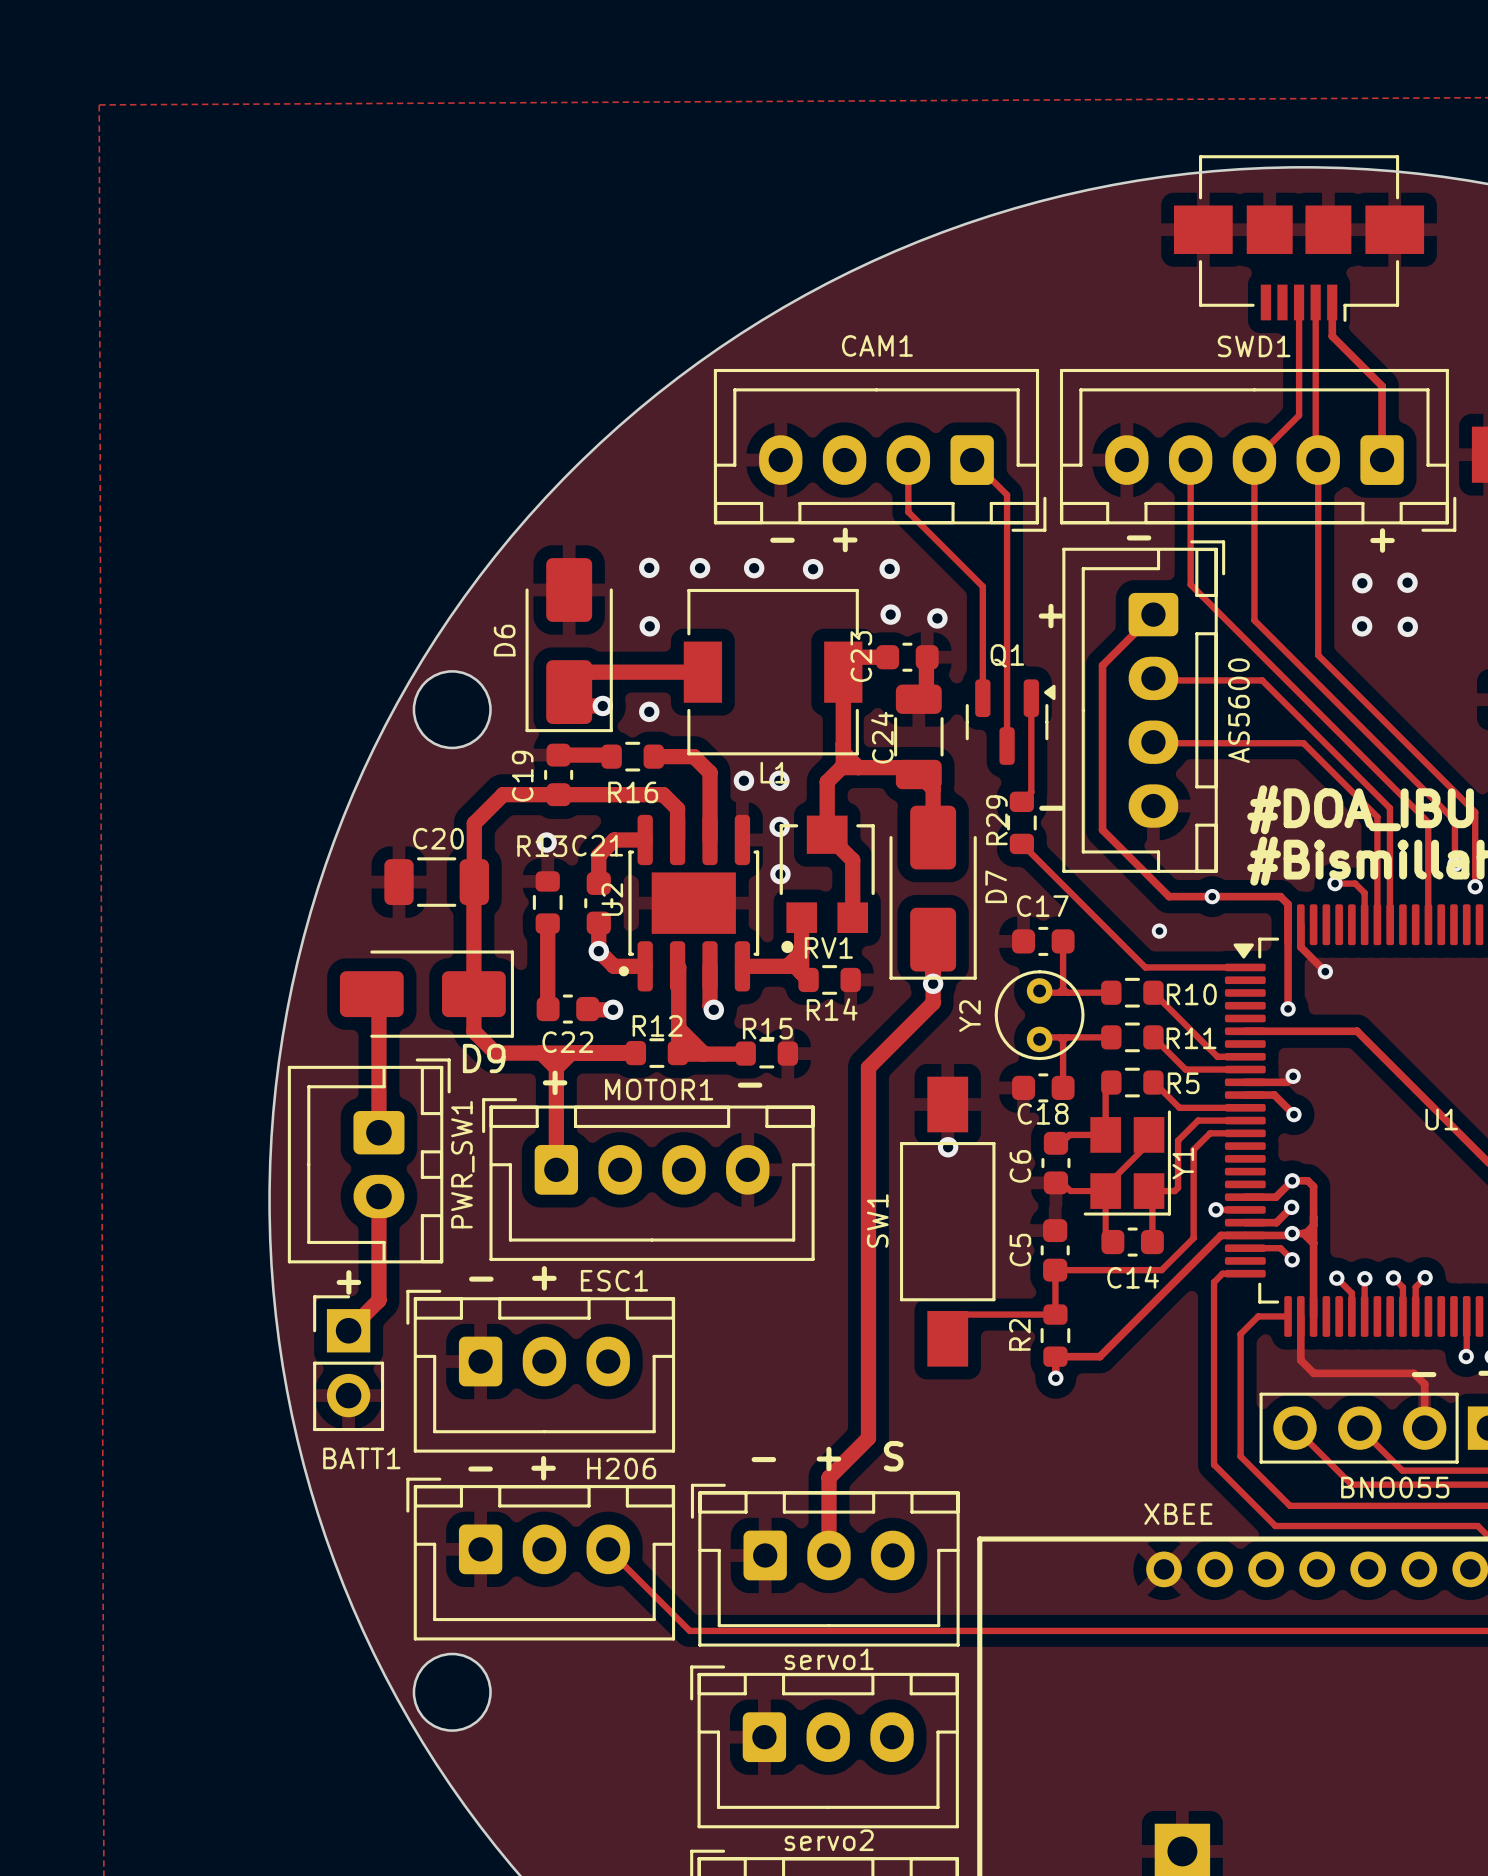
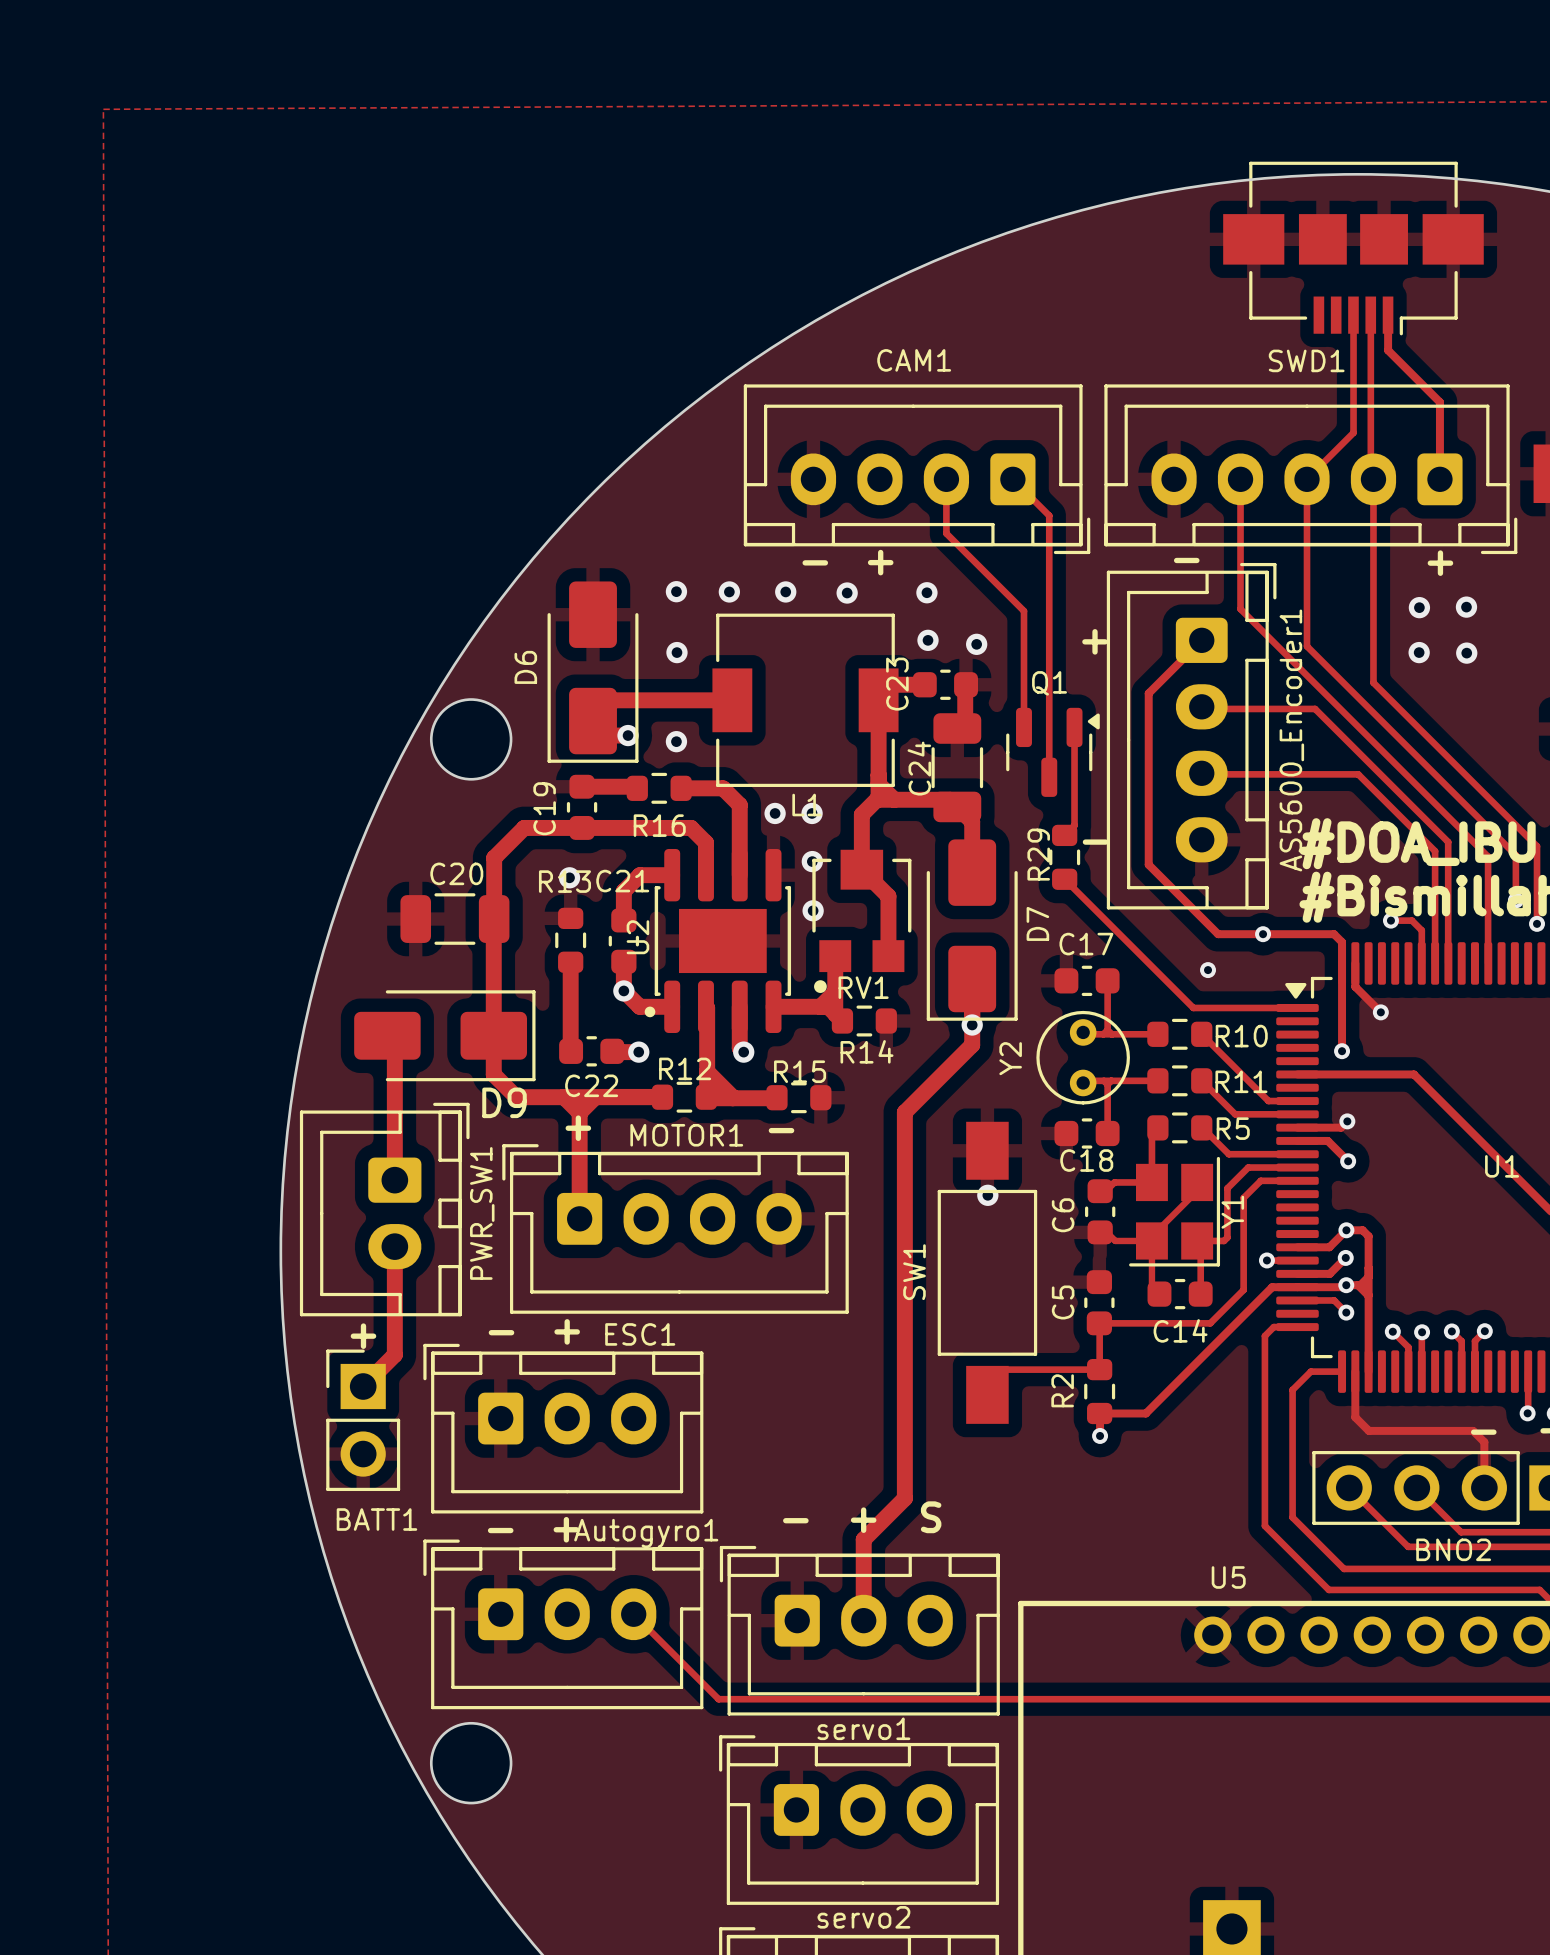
AS5600 name: AS5600 (1238, 710) -> AS5600_Encoder1 (1291, 740)
H206 name: H206 (621, 1468) -> Autogyro1 (646, 1533)
BNO055 name: BNO055 (1395, 1487) -> BNO2 (1453, 1549)
XBEE name: XBEE (1178, 1514) -> U5 (1228, 1577)

